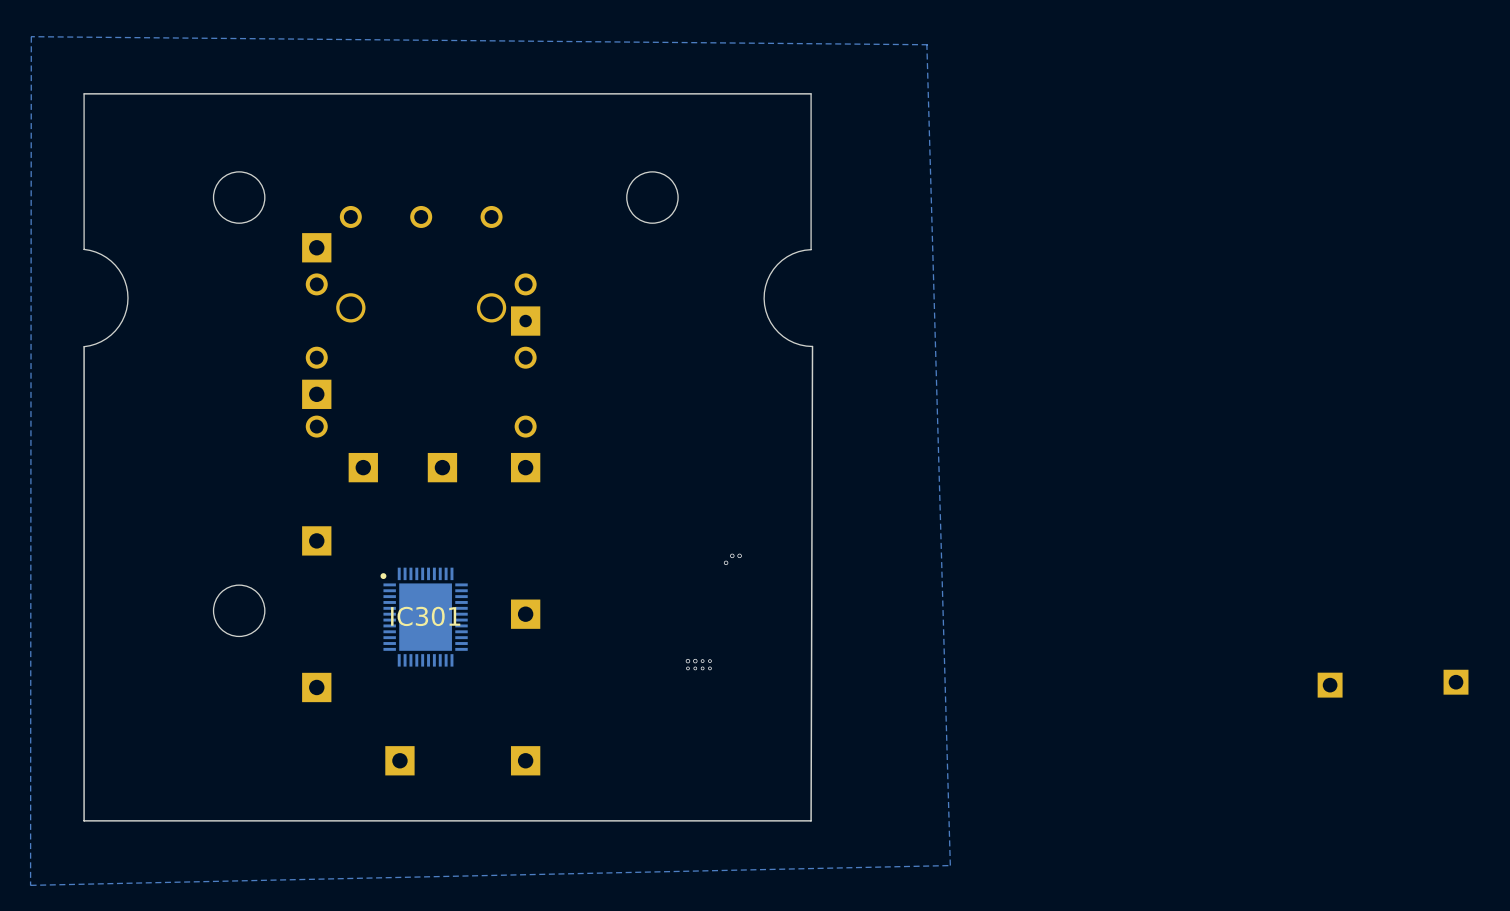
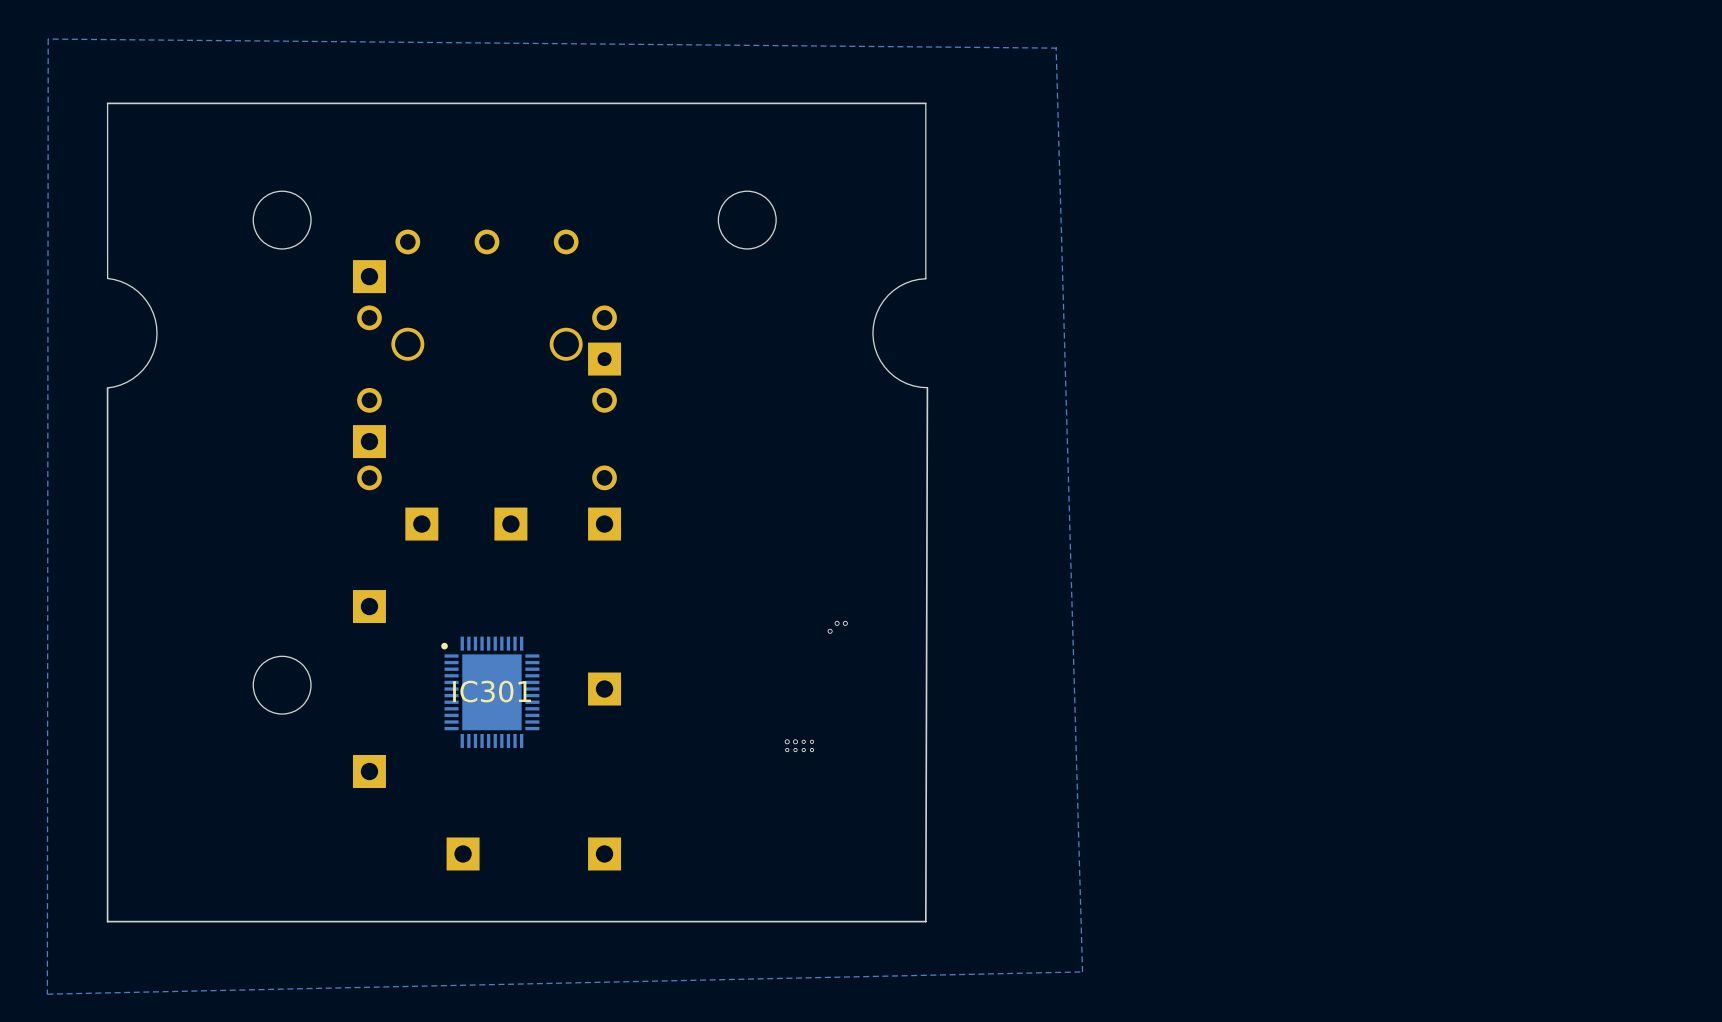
part: (1456, 682) -> none
part: (1330, 685) -> none

